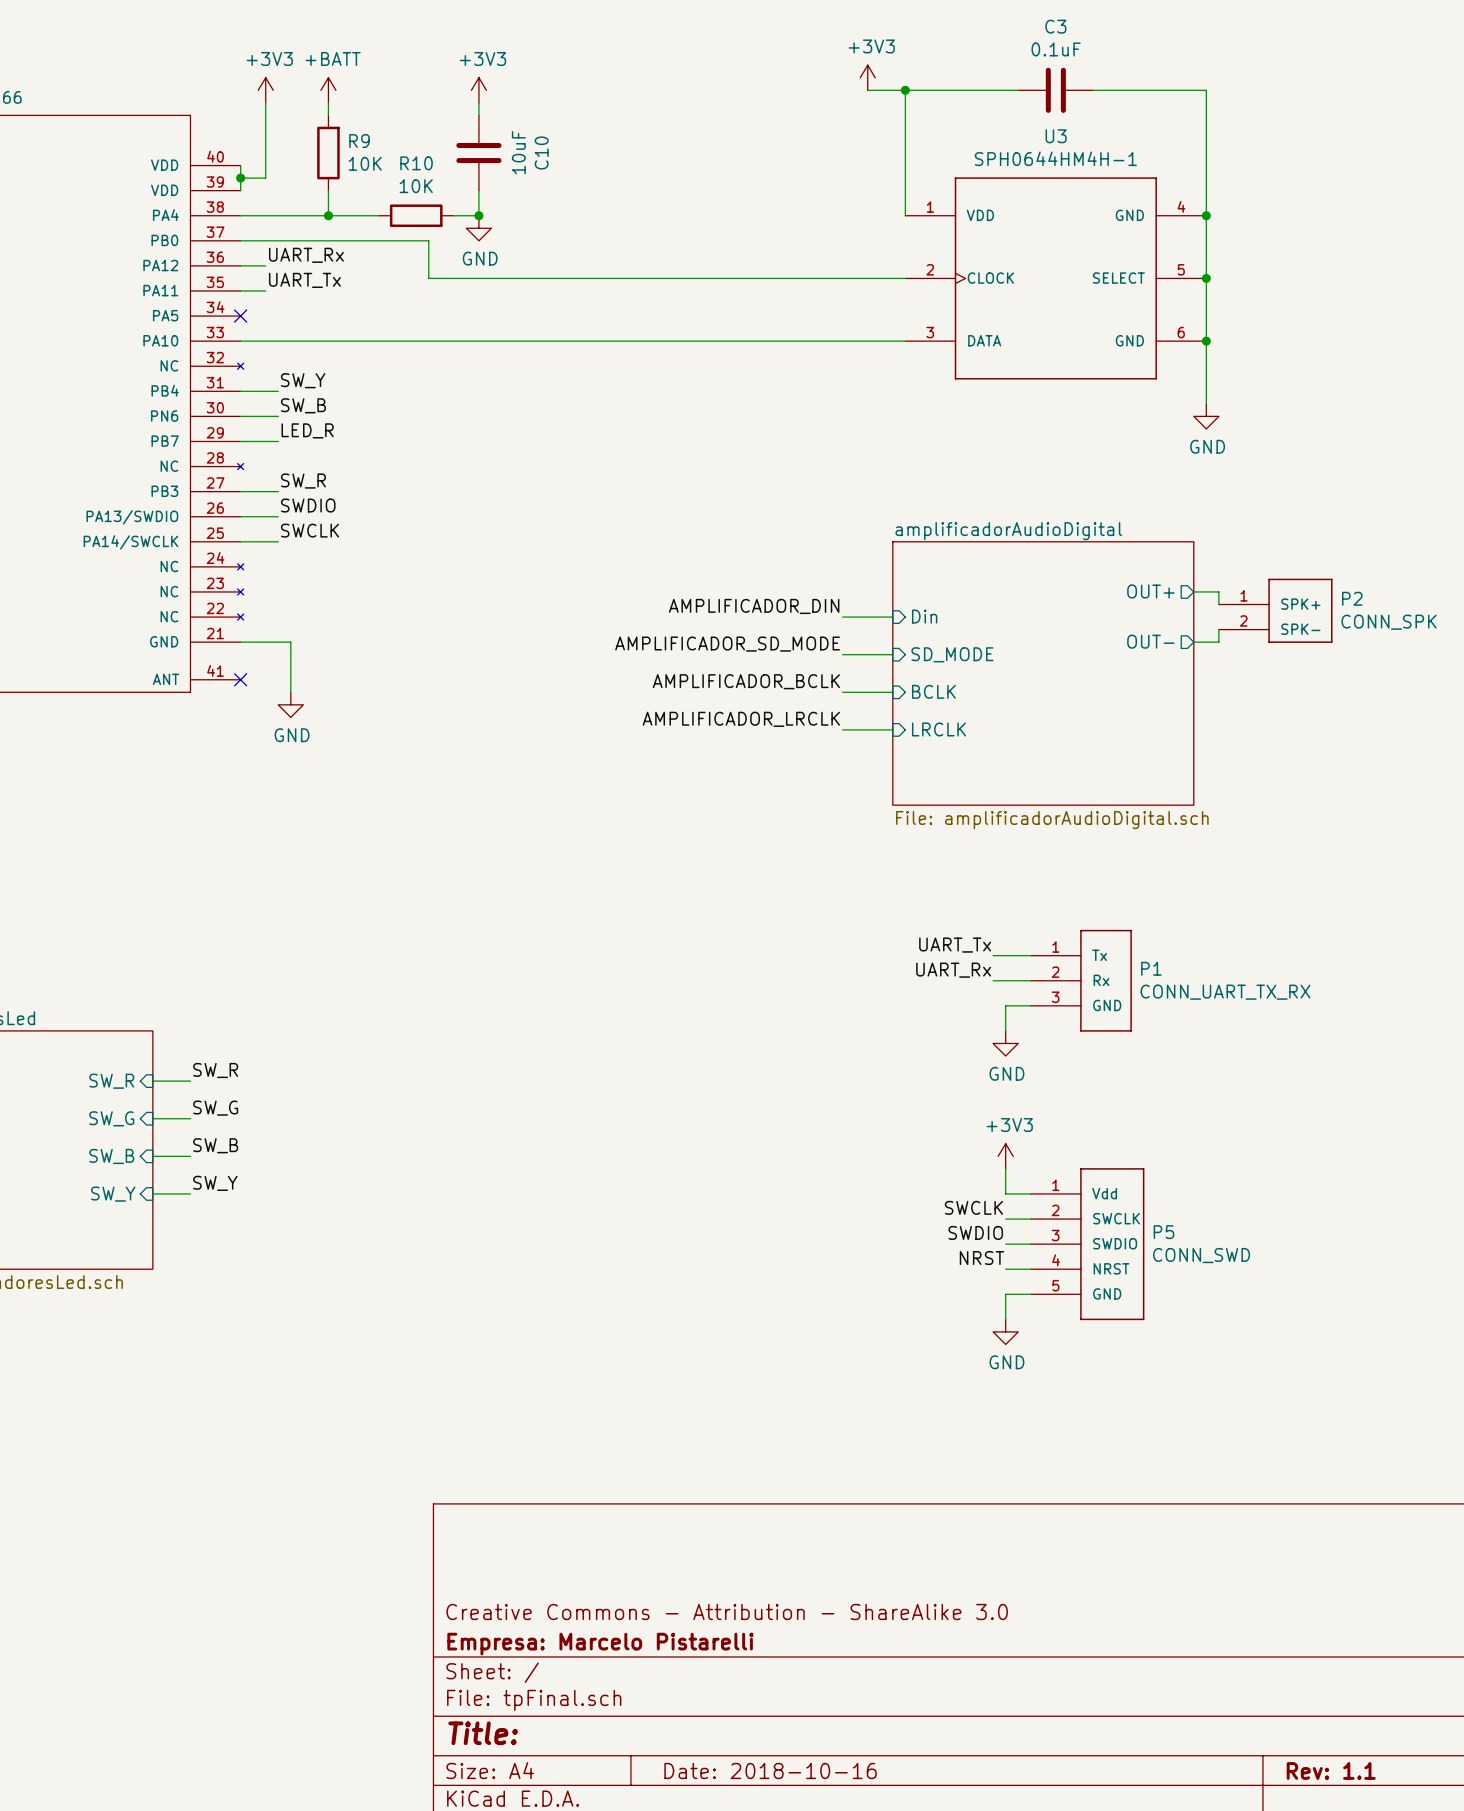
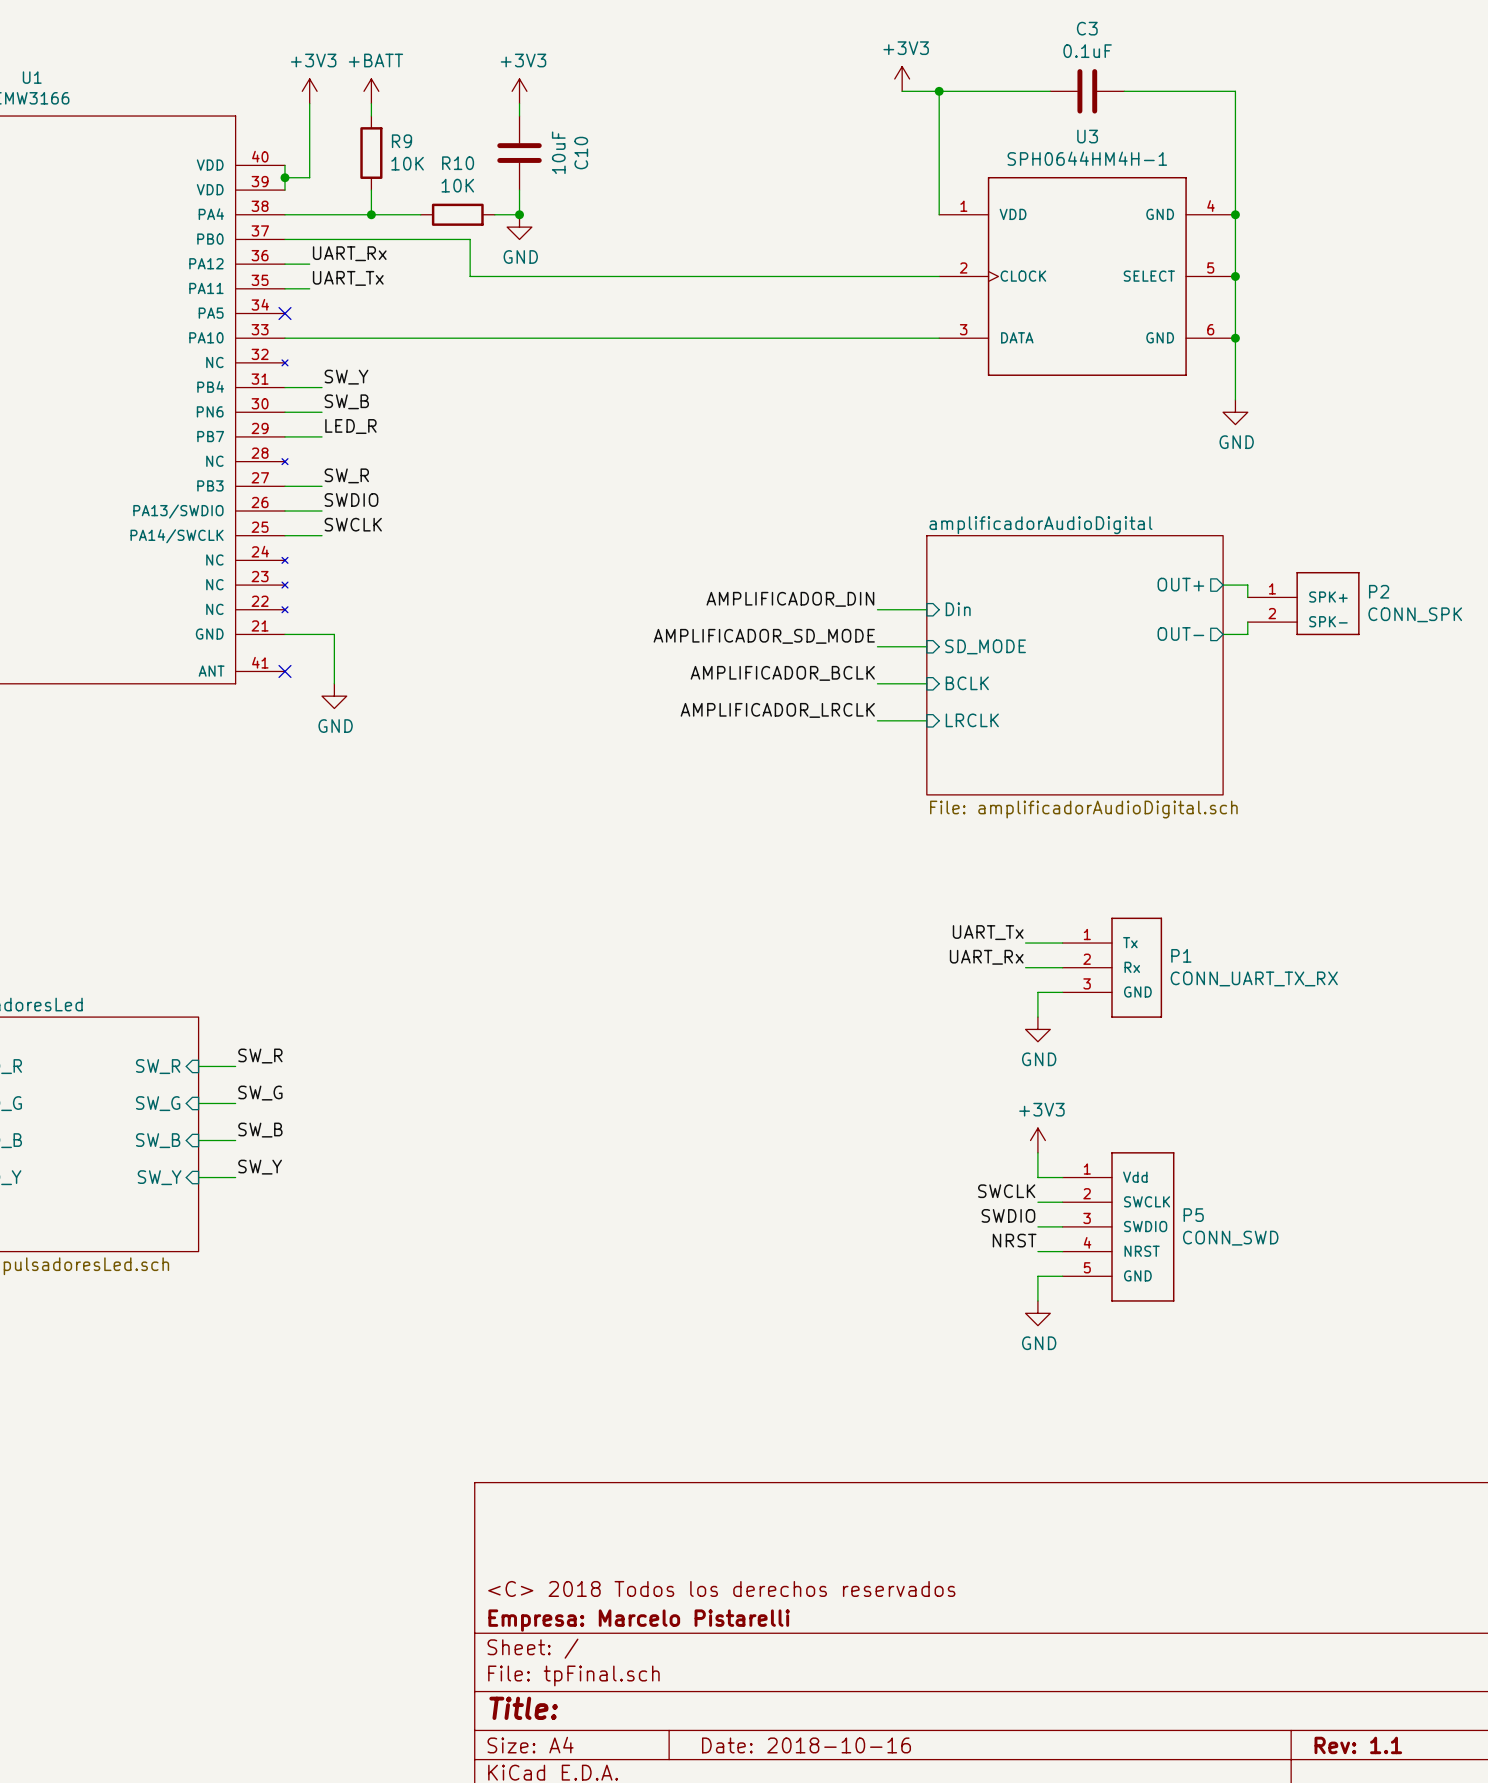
title block: Creative Commons - Attribution - ShareAlike 3.0 (727, 1611) -> <C> 2018 Todos los derechos reservados (721, 1588)

